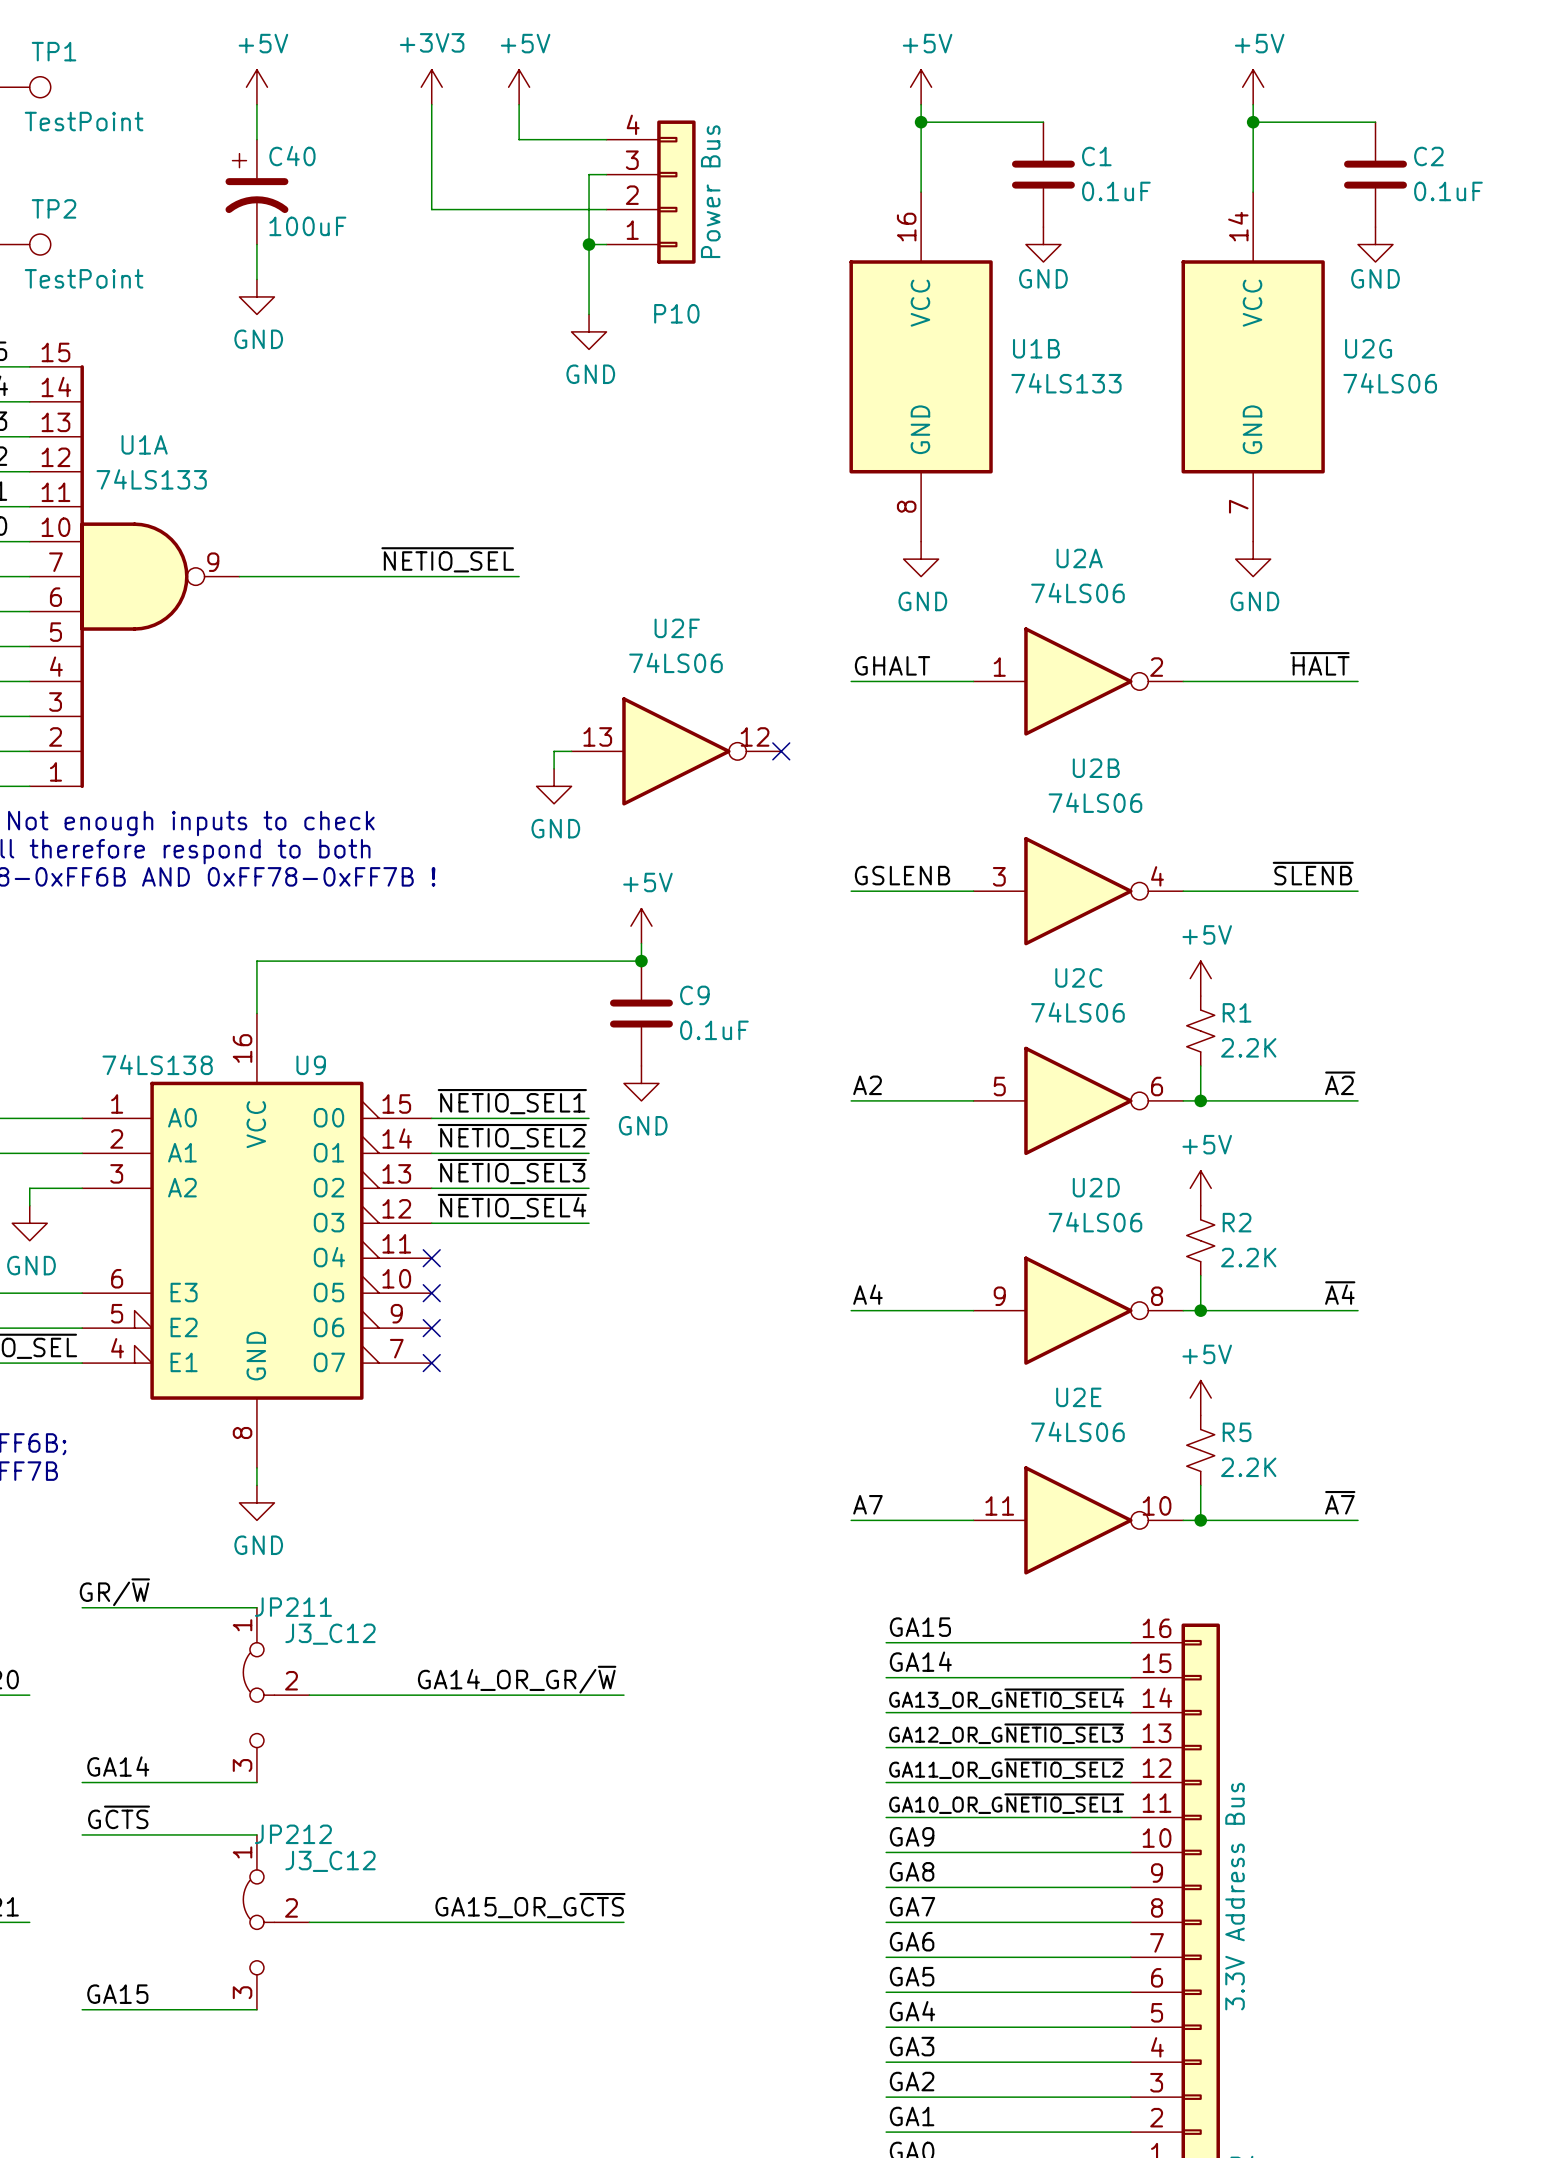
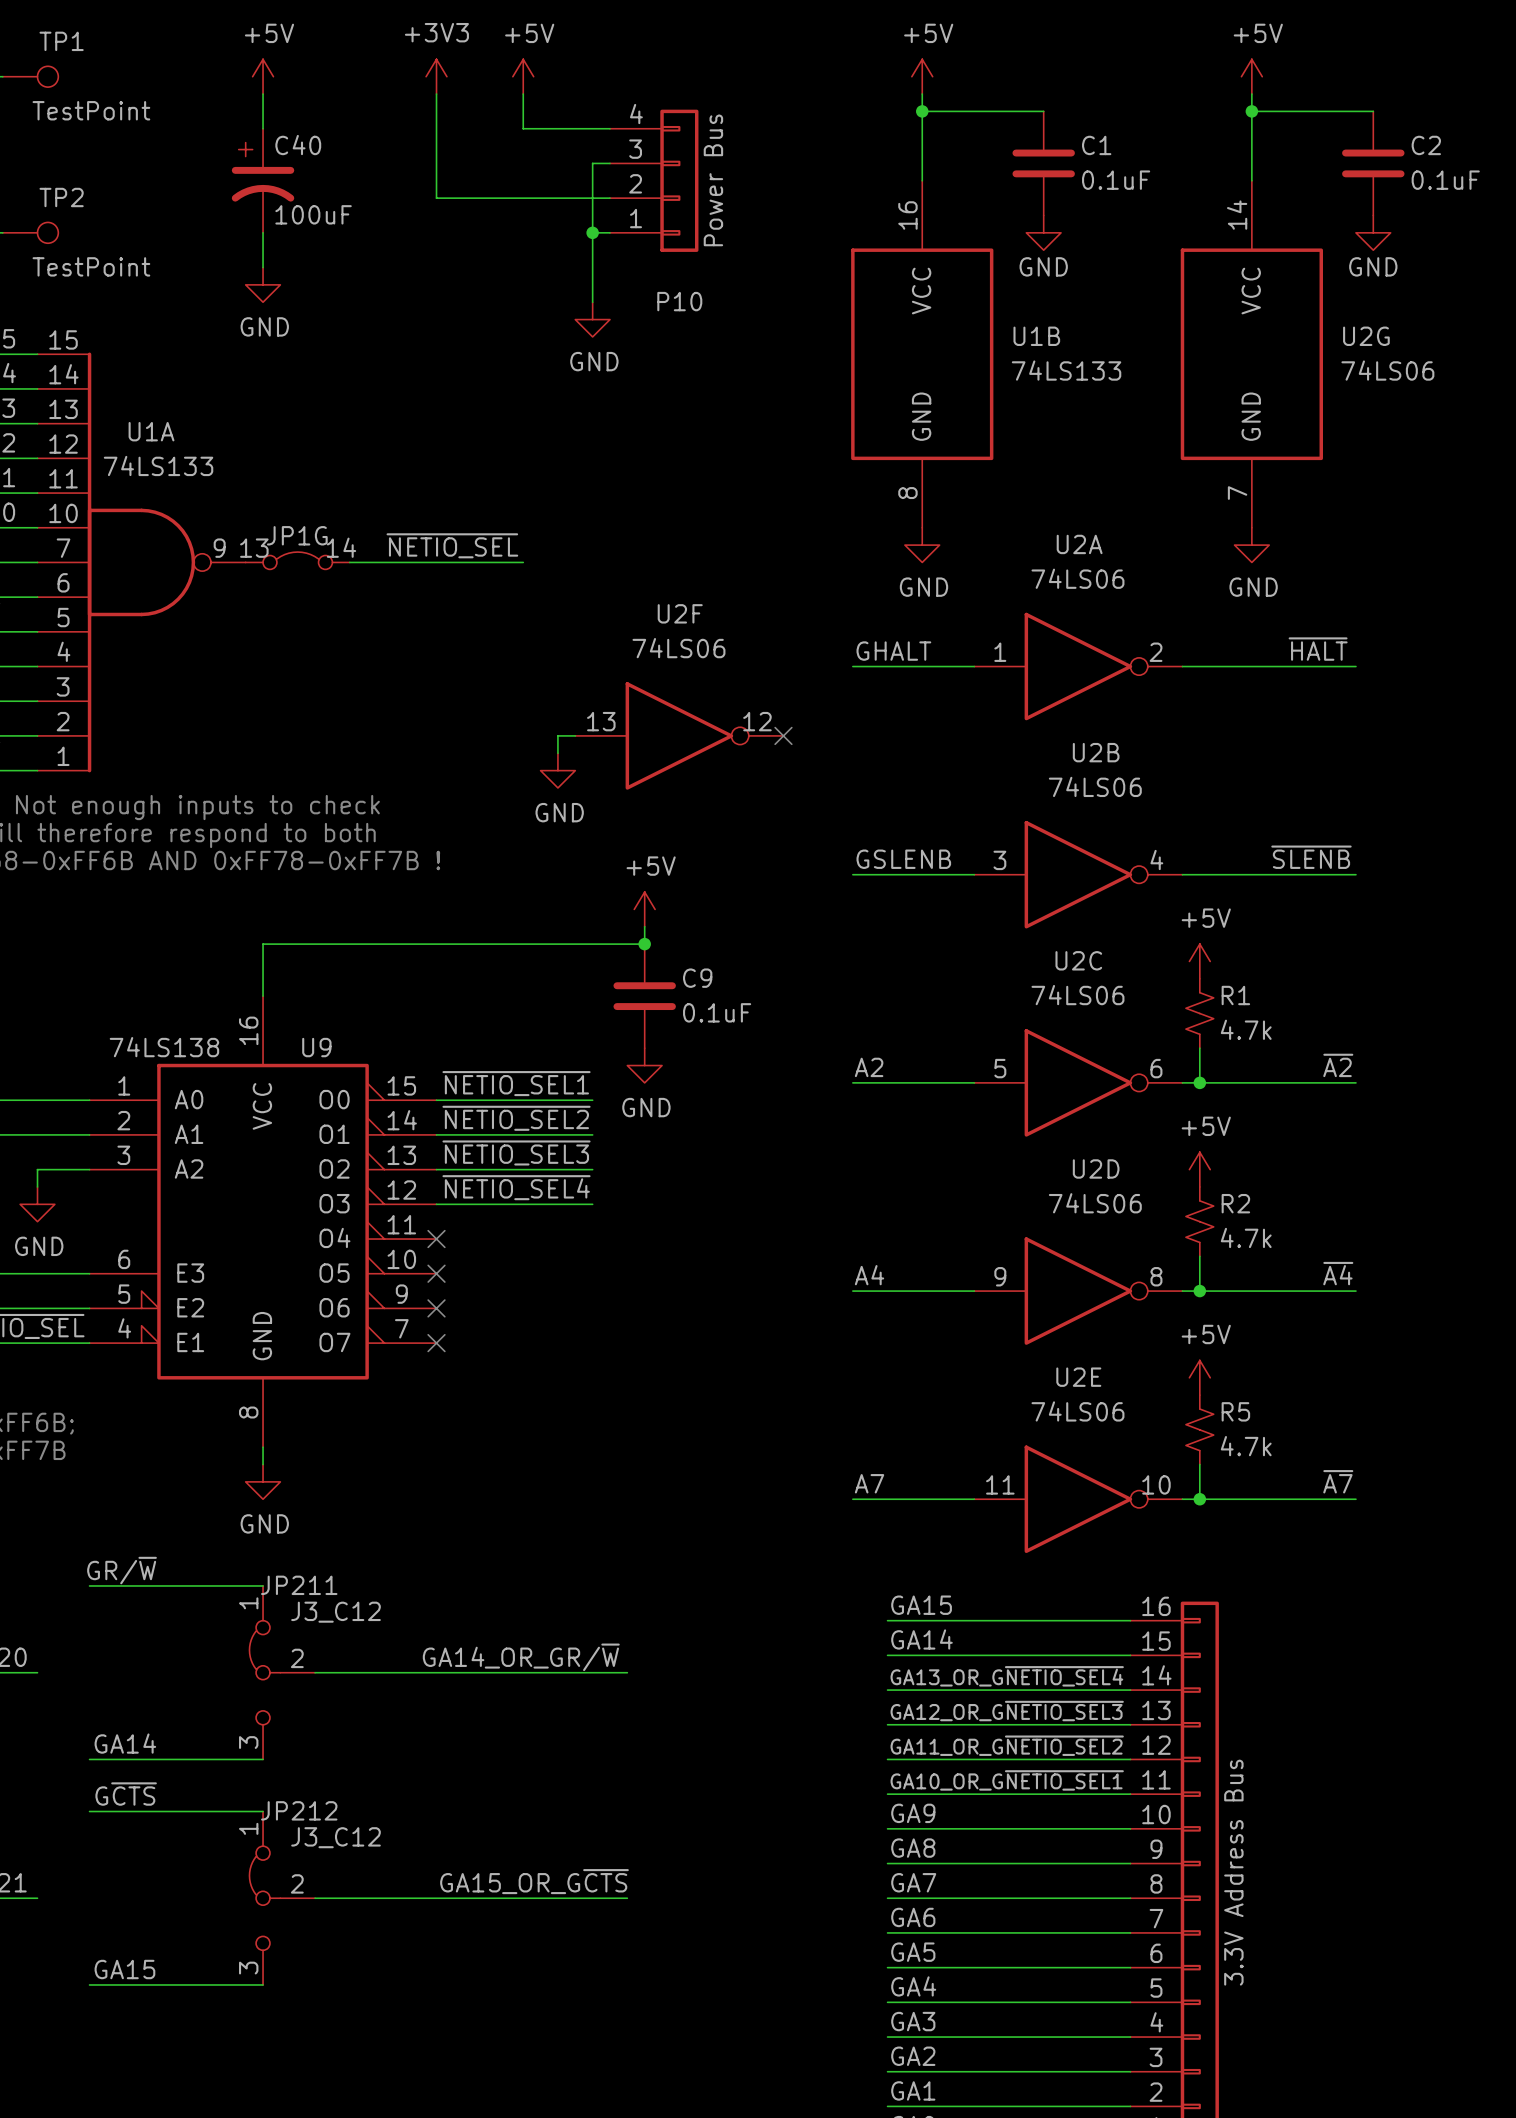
JP1G: none -> (297, 560)
wire: (239, 576) (344, 576) -> none
R1 value: 2.2K (1248, 1047) -> 4.7k (1246, 1029)
R2 value: 2.2K (1248, 1257) -> 4.7k (1246, 1237)
R5 value: 2.2K (1248, 1467) -> 4.7k (1246, 1446)

